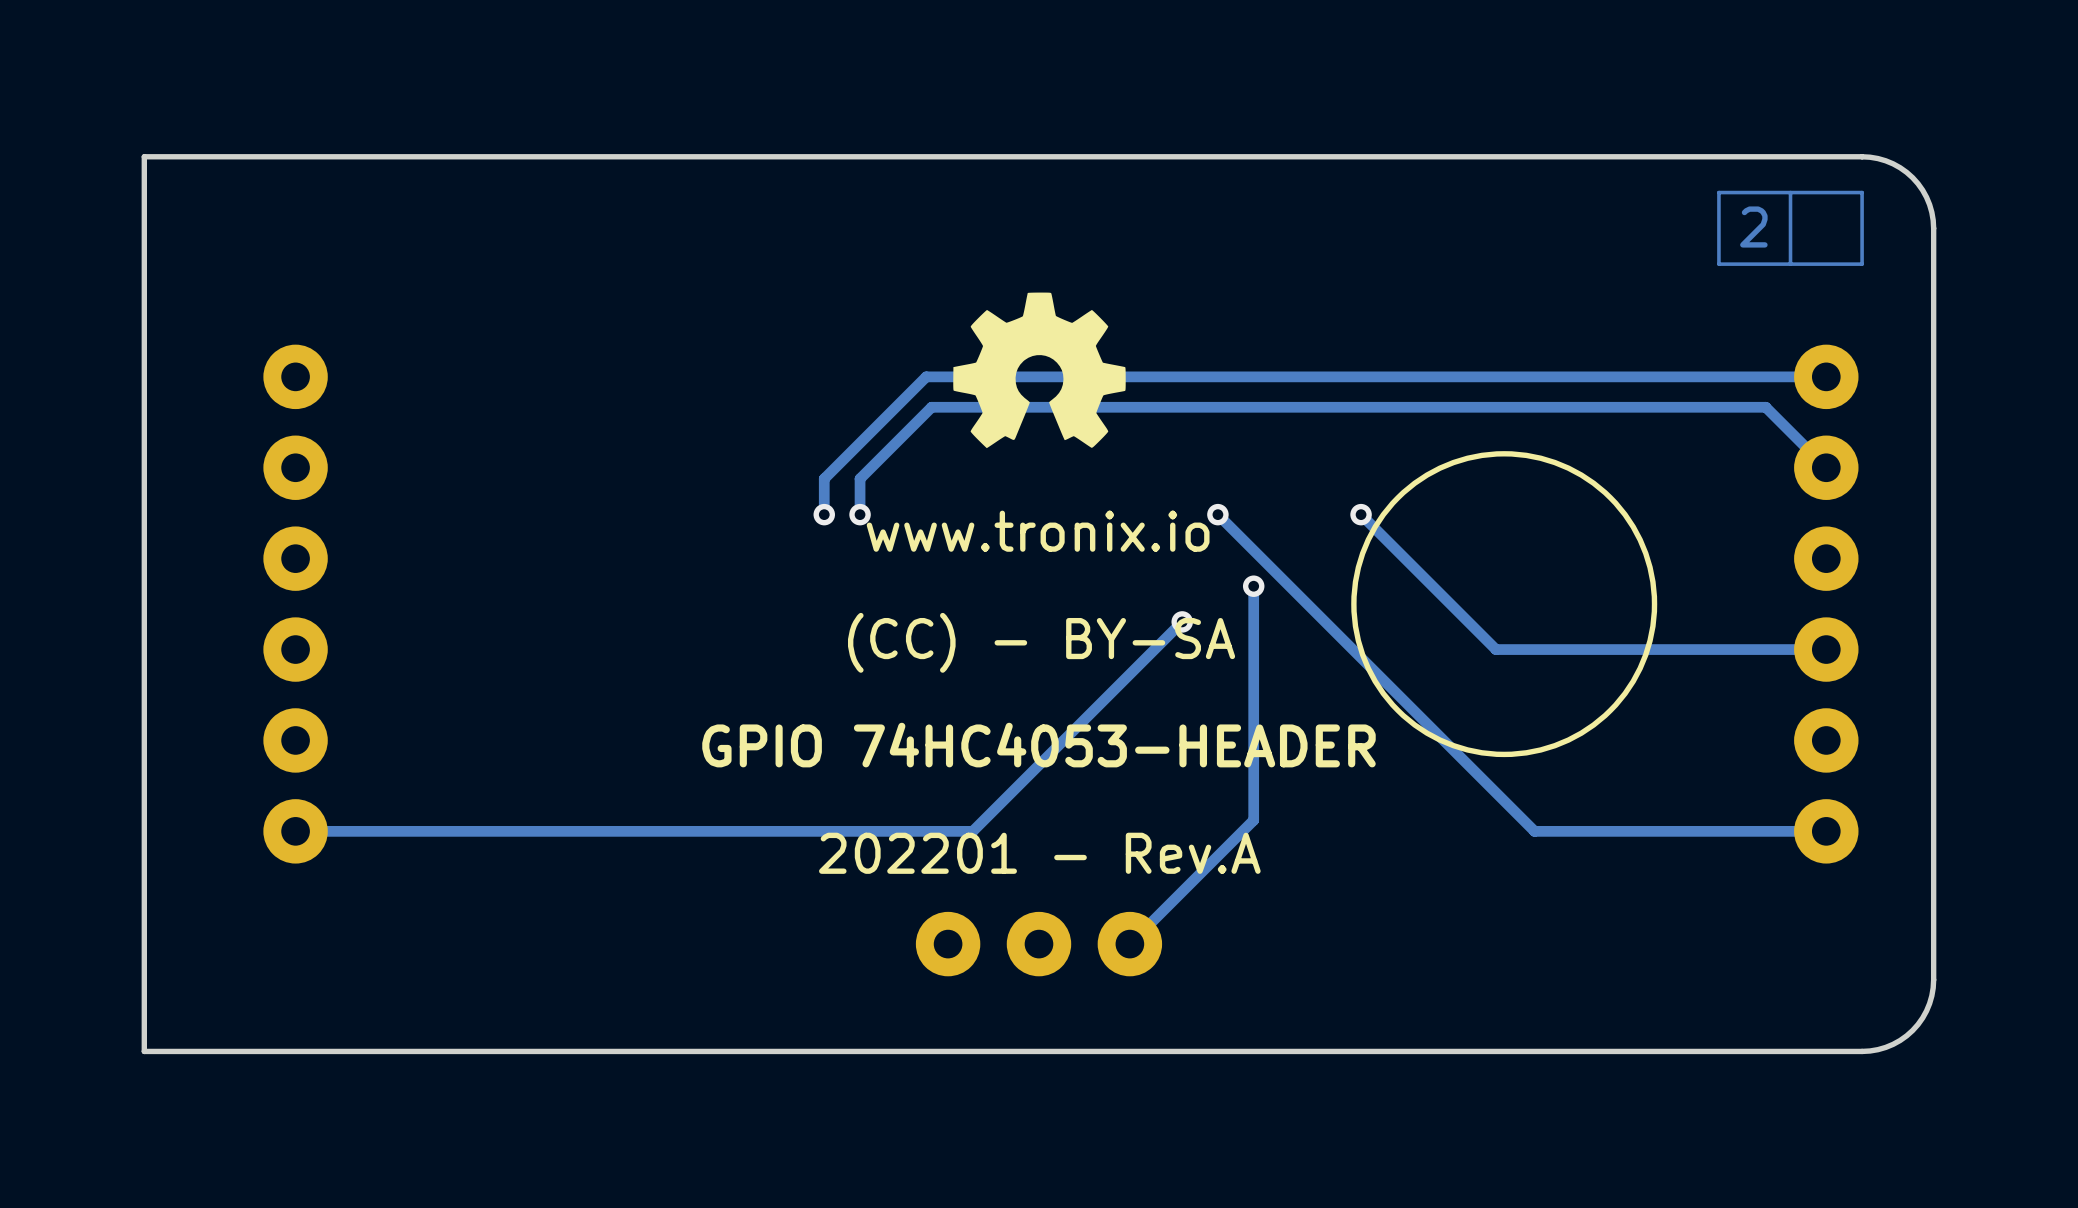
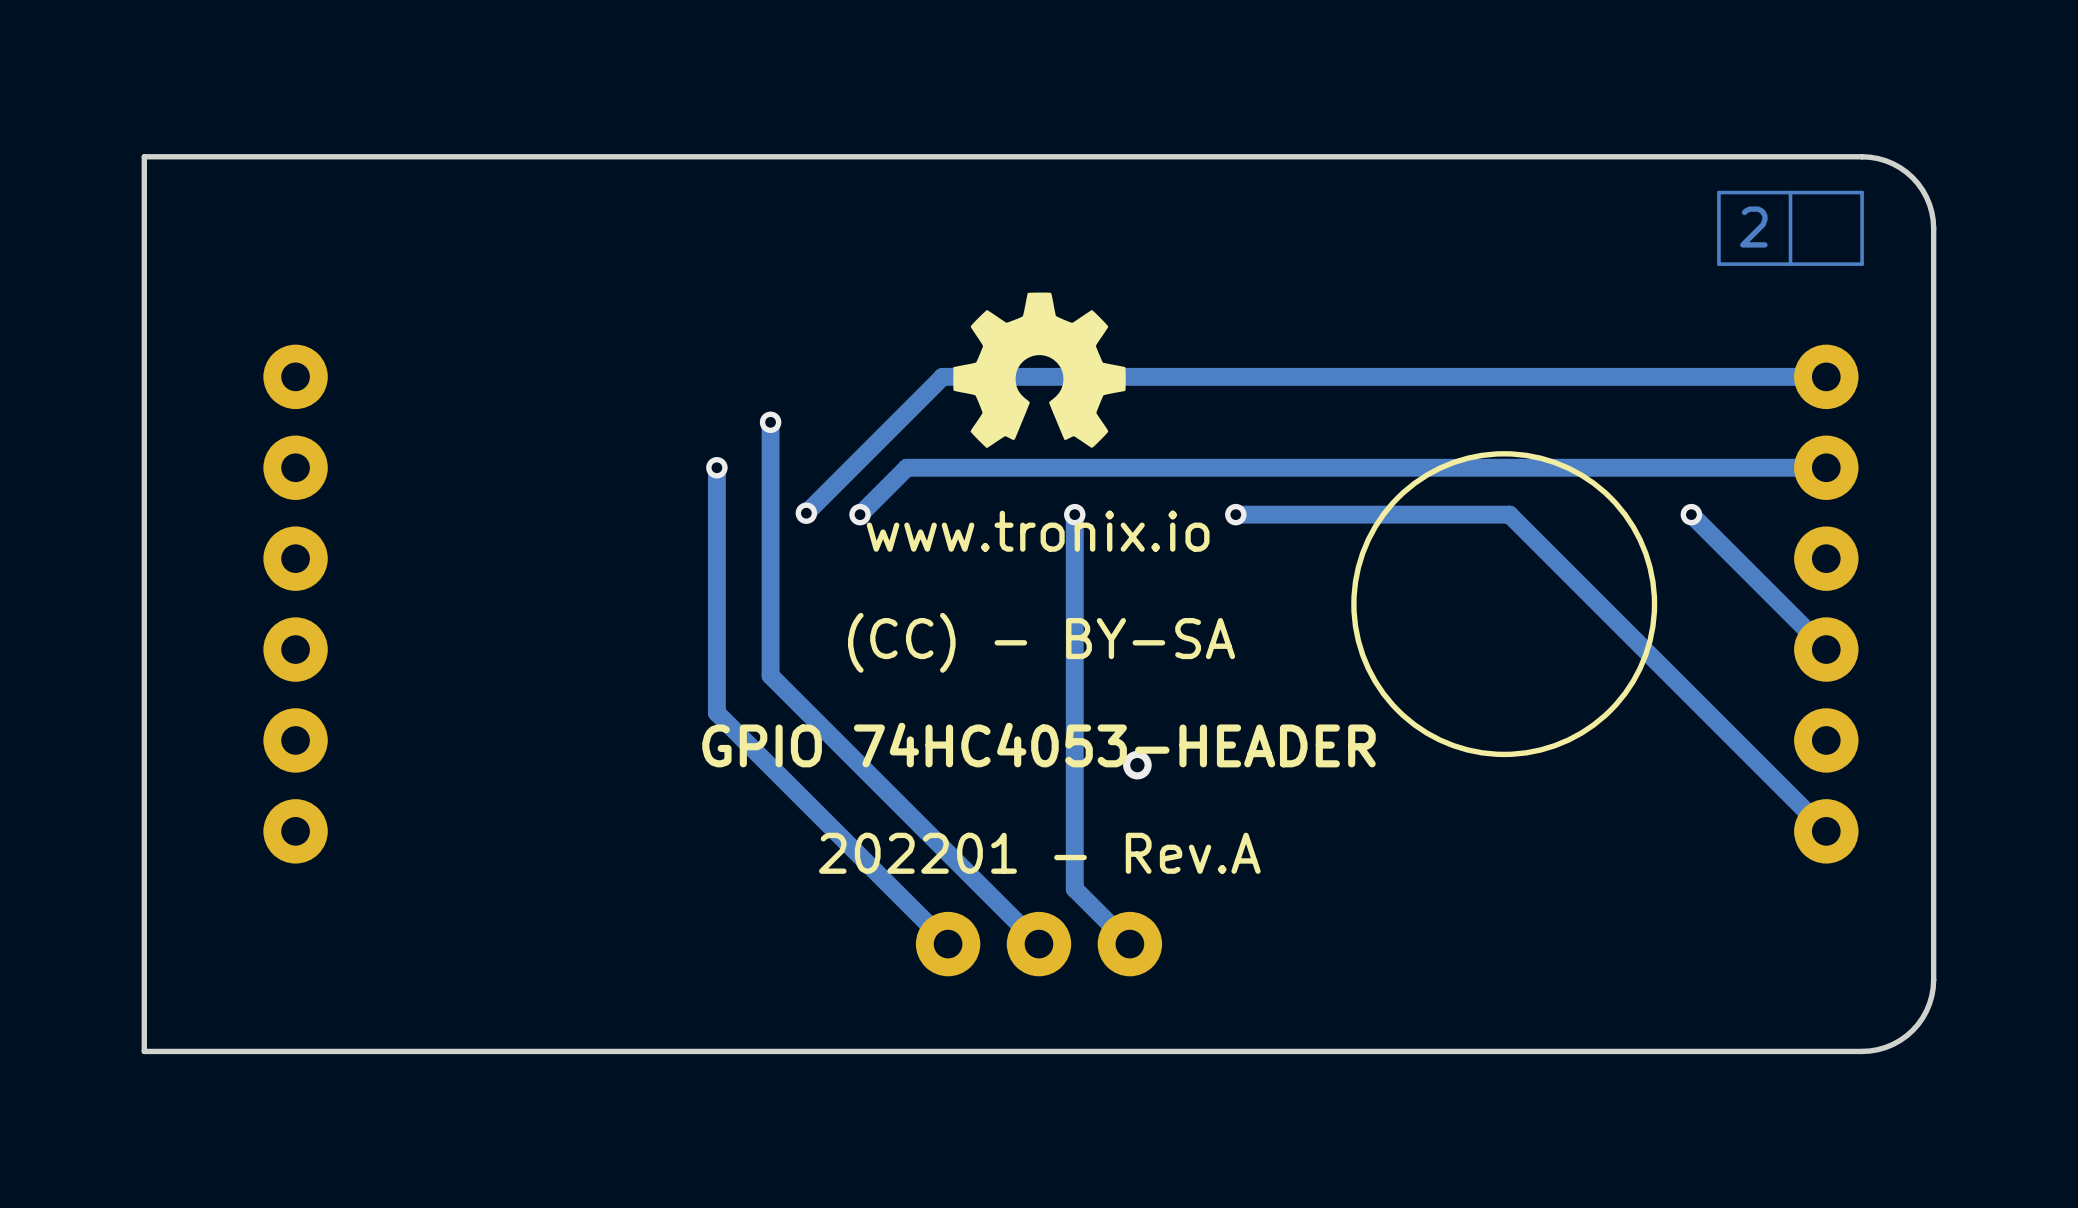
track: (942, 376) (926, 376) (824, 478) (824, 514) -> (942, 376) (806, 513)
track width: thin (1826, 376) (942, 376) -> thick (1826, 376) (942, 376)
track: none -> (770, 422) (770, 675) (1038, 944)
via: none -> (770, 422)
track: none -> (716, 467) (716, 712) (948, 944)
via: none -> (716, 467)
track: (1826, 467) (1765, 407) (931, 407) (860, 478) (860, 514) -> (1826, 467) (906, 467) (860, 513)
via position: (824, 514) -> (806, 513)
via: none -> (1074, 514)
track: (1217, 514) (1534, 831) (1826, 831) -> (1235, 514) (1509, 514) (1826, 831)
via position: (1217, 514) -> (1235, 514)
track: (1361, 514) (1495, 649) (1826, 649) -> (1691, 514) (1826, 649)
via: (1361, 514) -> none
via: none -> (1691, 514)
track: (1253, 586) (1253, 820) (1129, 944) -> (1074, 514) (1074, 888) (1129, 944)
via: (1253, 586) -> none
track: (1182, 621) (972, 831) (295, 831) -> none
via: (1182, 621) -> none
via: none -> (1137, 765)

